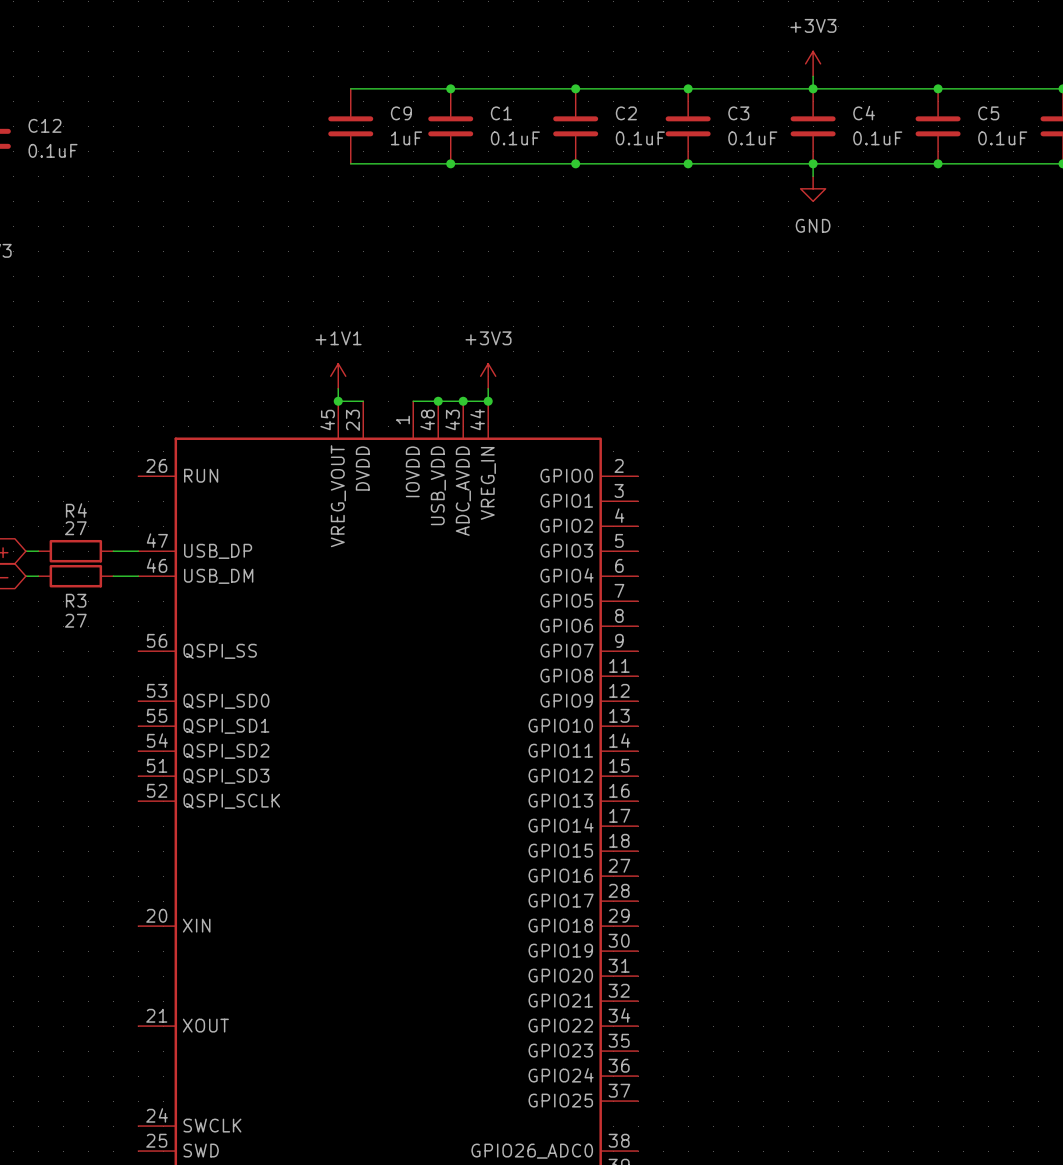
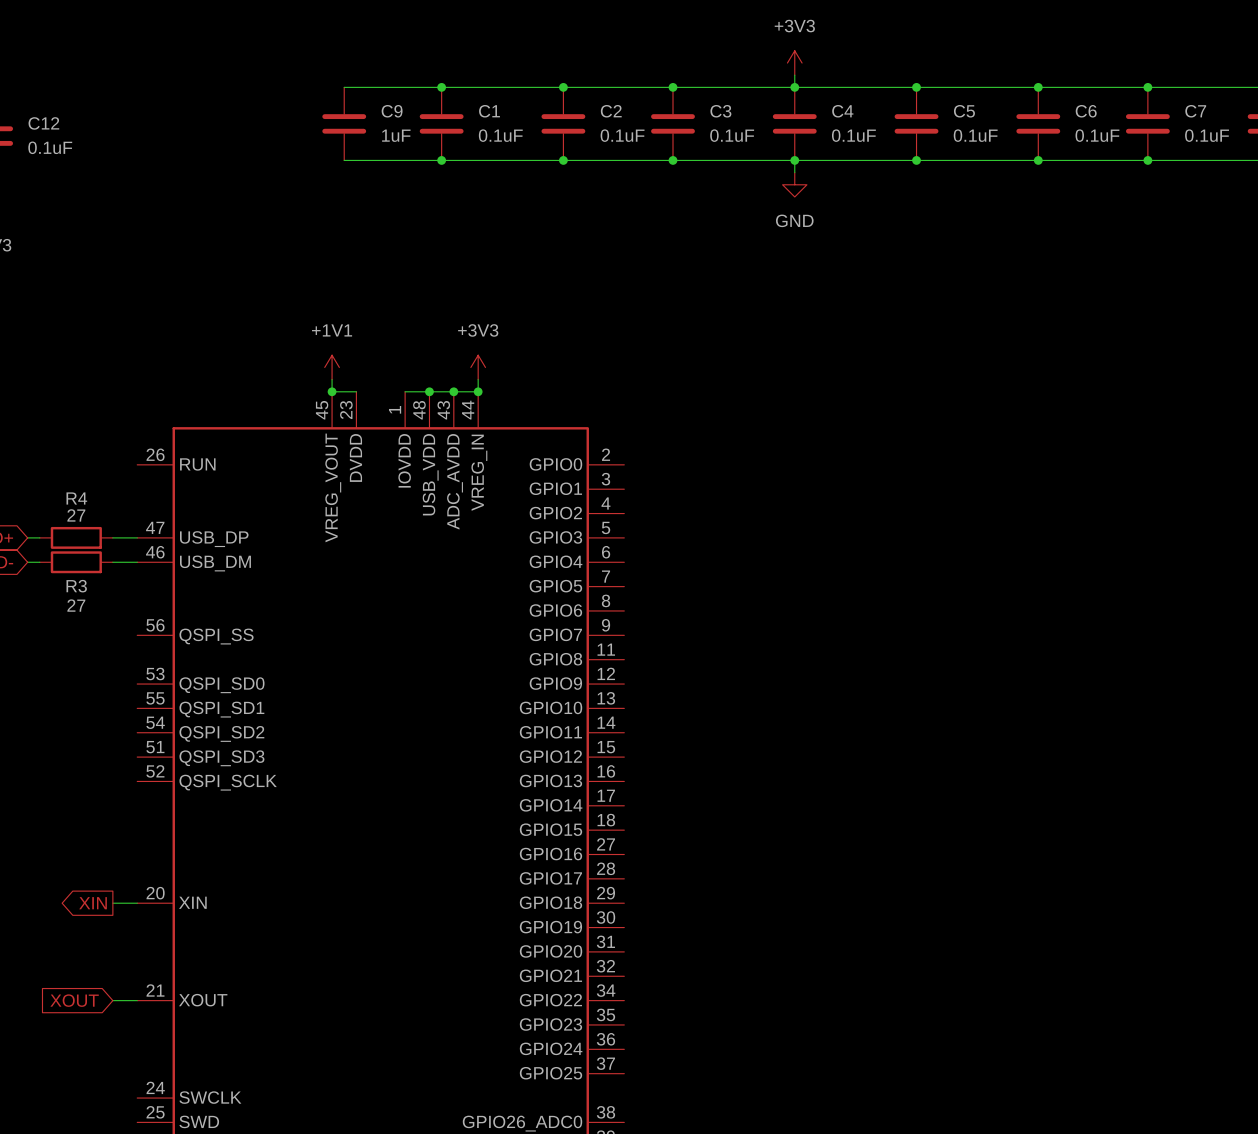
global label: none -> XIN (93, 903)
wire: none -> (112, 903) (137, 903)
global label: none -> XOUT (74, 1000)
wire: none -> (112, 1000) (137, 1000)

